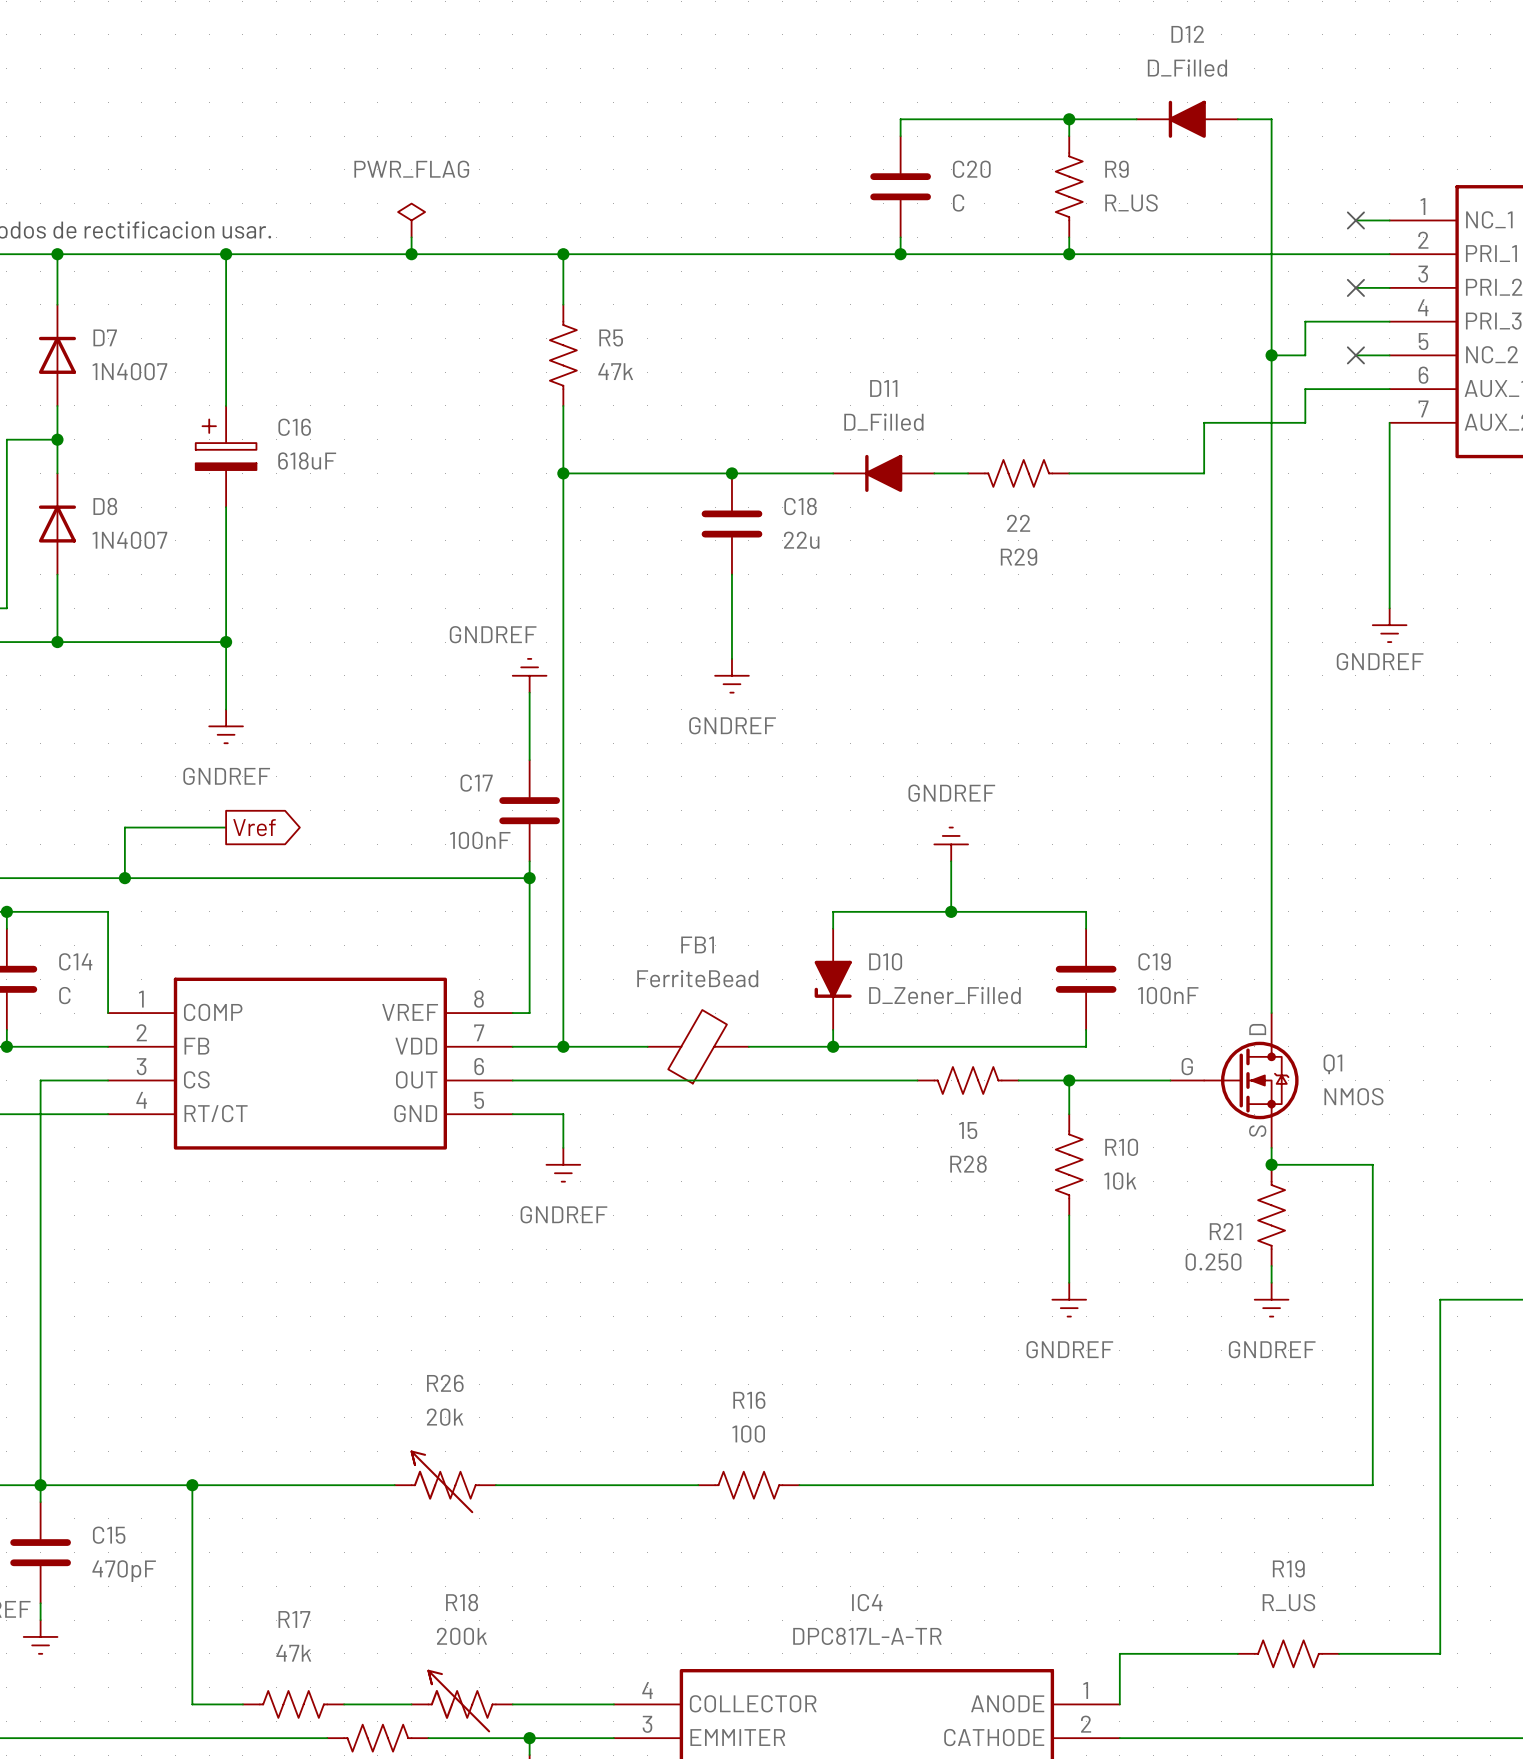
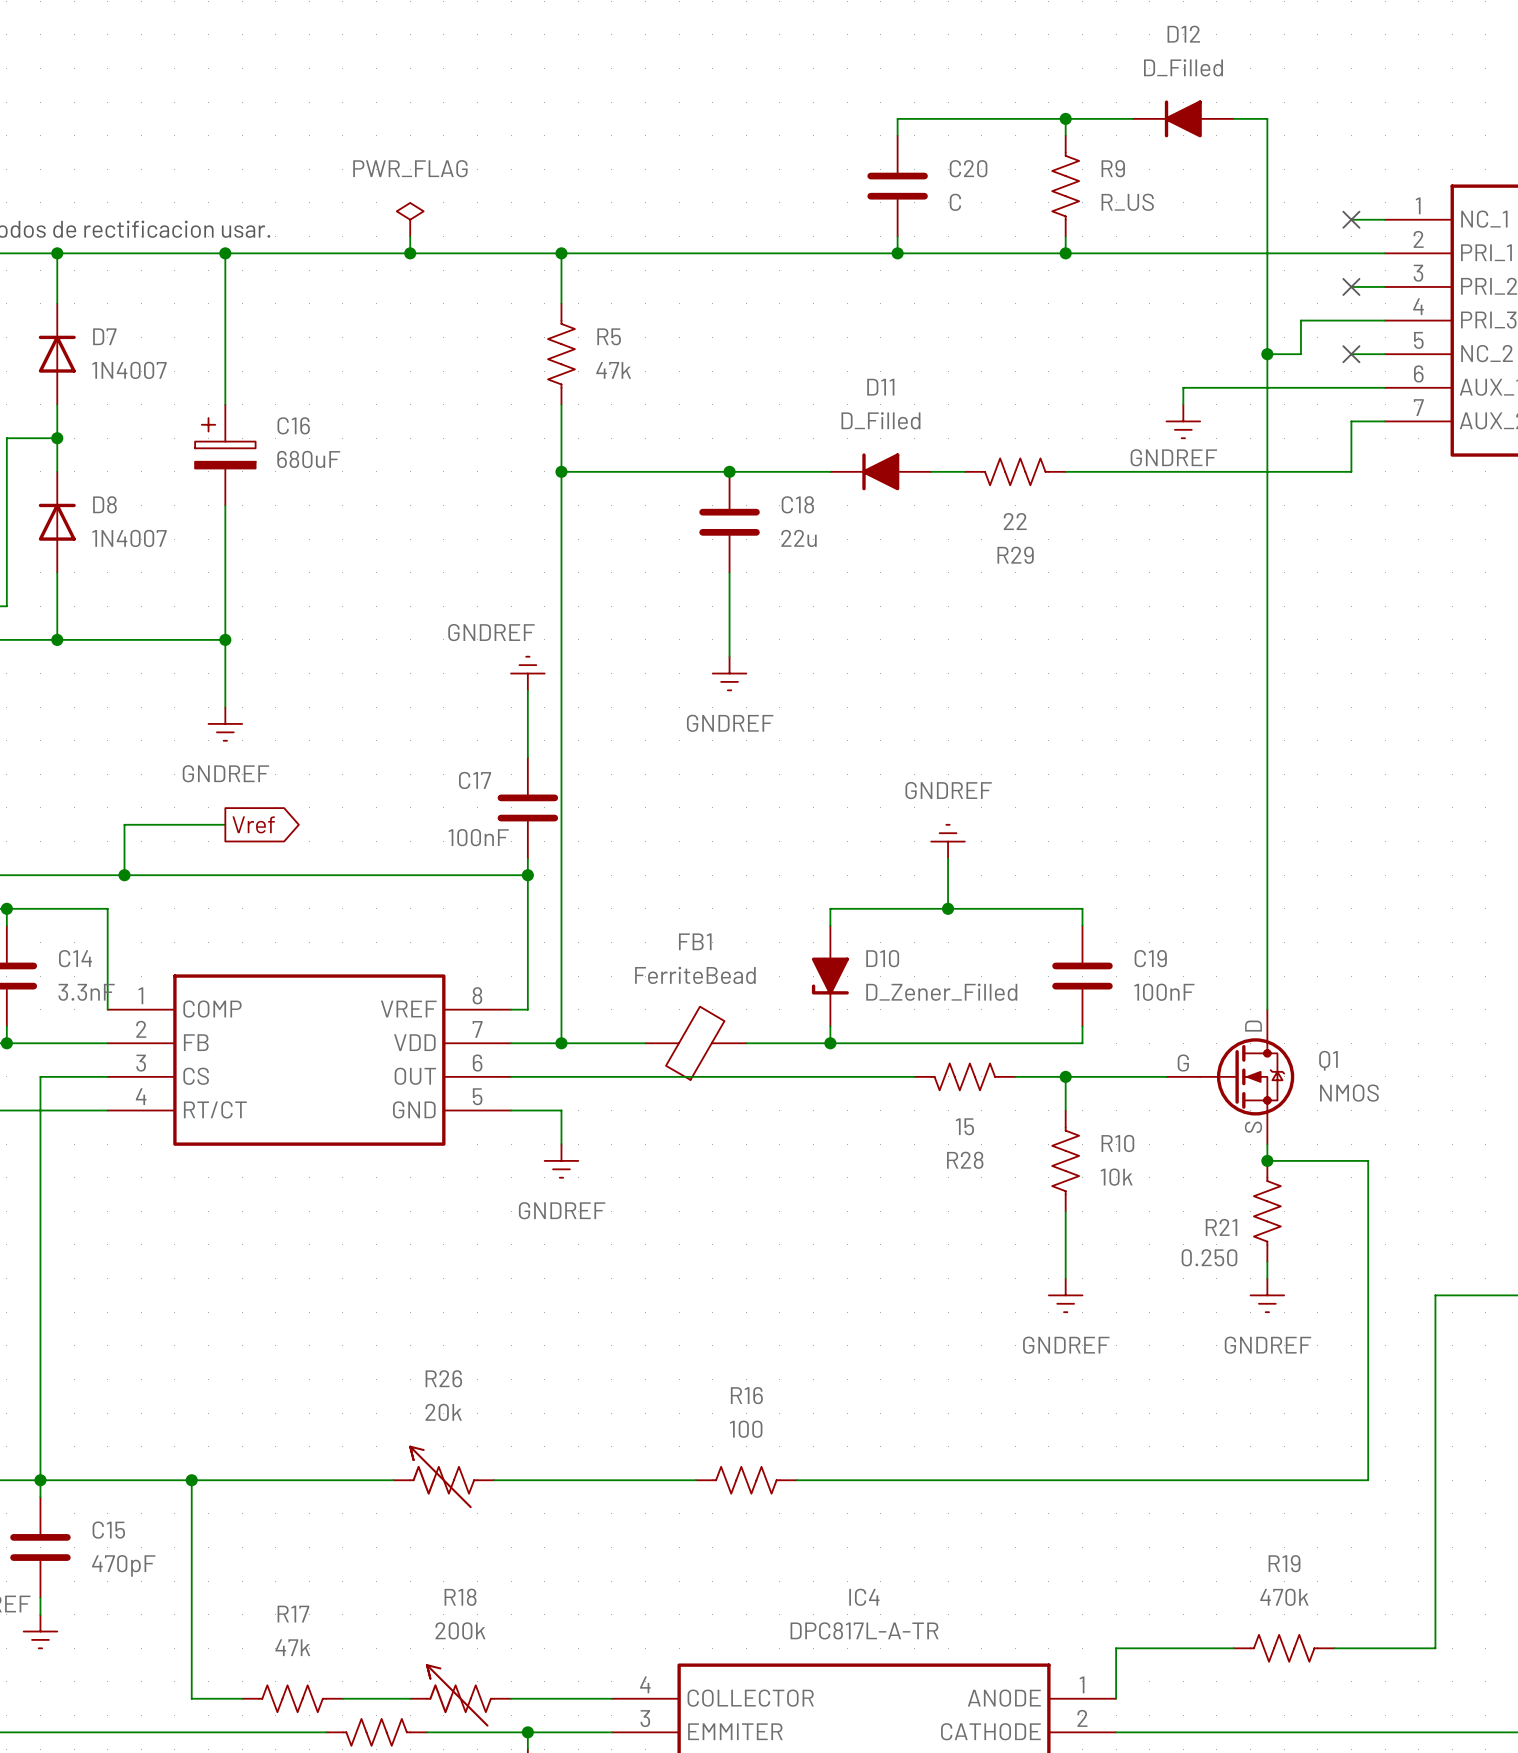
wire: (1305, 389) (1305, 422) (1204, 422) (1204, 473) -> (1300, 387) (1183, 387) (1183, 404)
wire: (1389, 422) (1389, 608) -> (1385, 421) (1351, 421) (1351, 471) (1200, 471)
C16 value: 618uF (307, 460) -> 680uF (308, 459)
power symbol position: GNDREF (1389, 625) -> GNDREF (1183, 421)
C14 value: C (64, 995) -> 3.3nF (86, 992)
R19 value: R_US (1288, 1602) -> 470k (1284, 1597)

